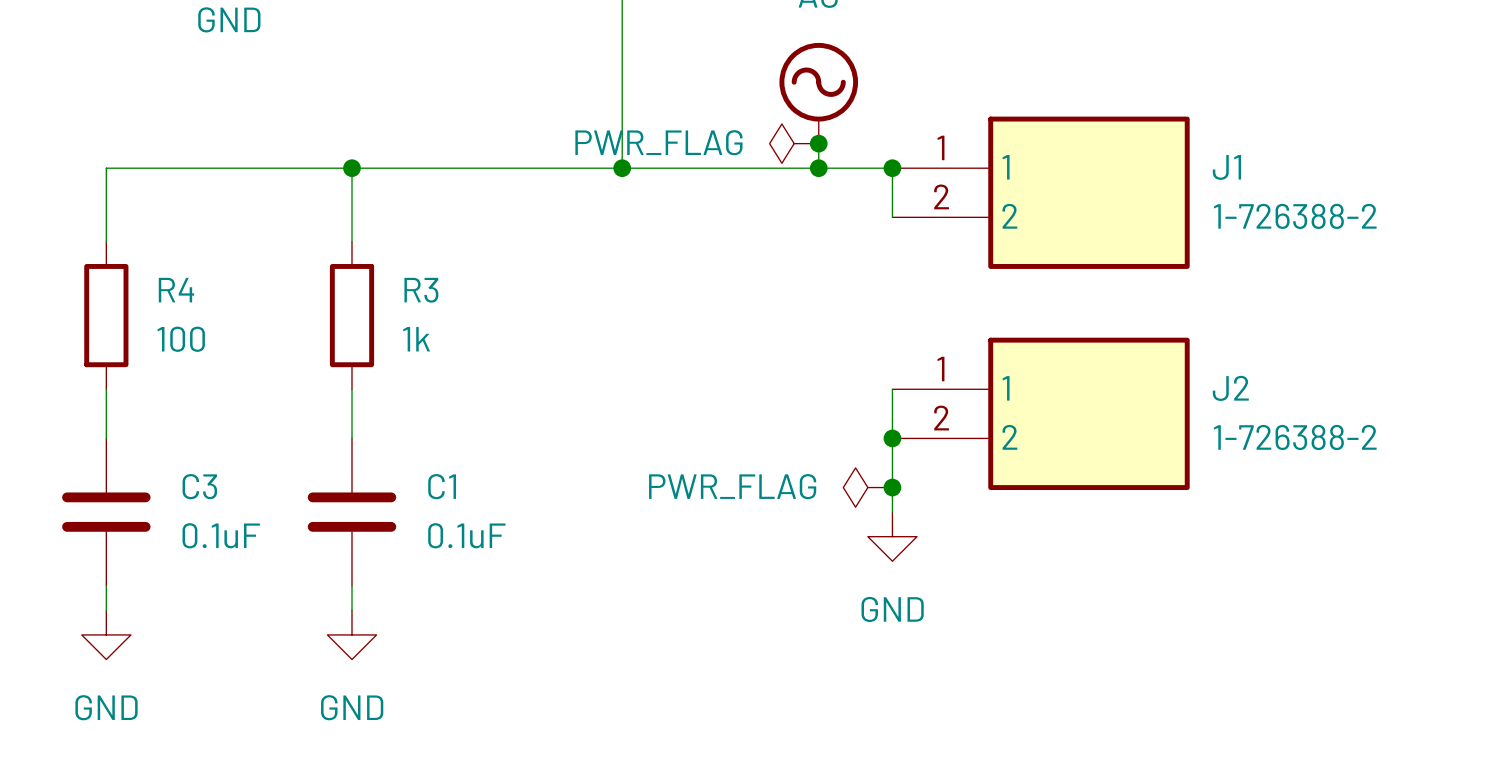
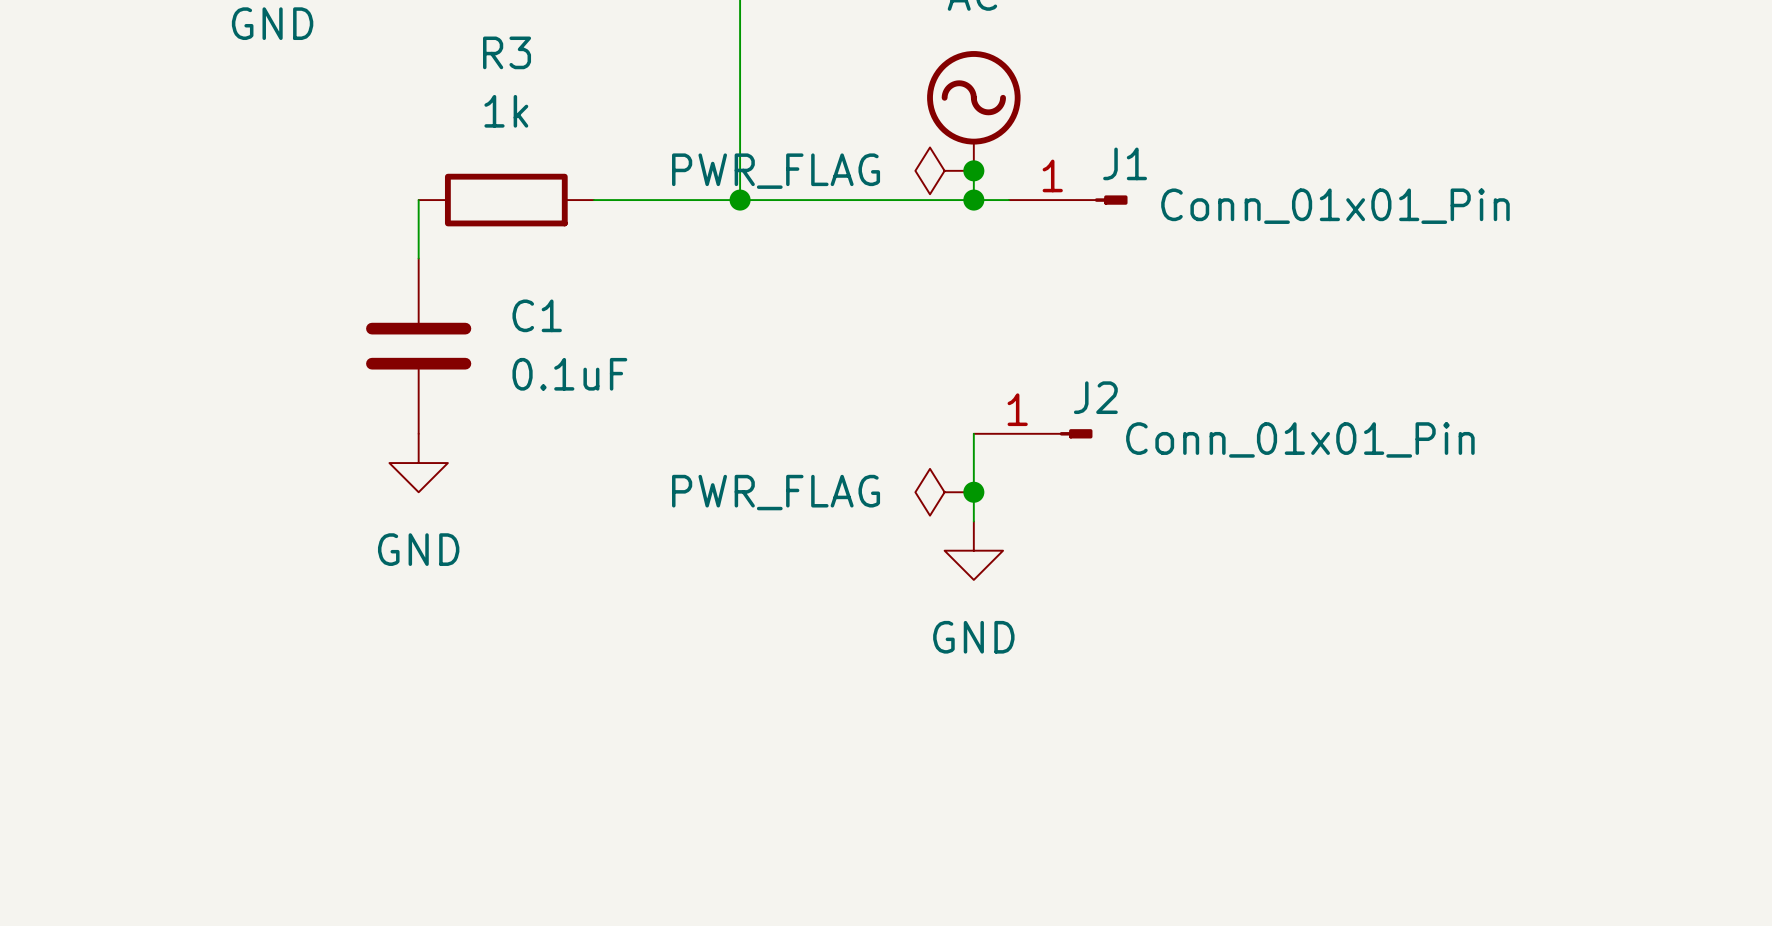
J1 symbol: [892, 116, 1190, 269] -> [1008, 195, 1128, 205]
J1 name position: J1 (1226, 167) -> J1 (1125, 163)
junction: (351, 168) -> none
wire: (499, 168) (106, 168) (106, 241) -> none
wire: (848, 168) (892, 168) (892, 217) -> none
junction: (892, 168) -> none
J1 value: 1-726388-2 (1295, 216) -> Conn_01x01_Pin (1335, 206)
R3 name position: R3 (421, 290) -> R3 (507, 52)
R4: 100 (106, 315) -> none
R3 rotation: 0° (351, 315) -> 90° clockwise (506, 200)
R3 position: (351, 315) -> (506, 200)
J2 symbol: [892, 337, 1190, 491] -> [973, 429, 1093, 439]
R3 value position: 1k (416, 339) -> 1k (506, 111)
wire: none -> (973, 433) (973, 521)
J2 name position: J2 (1230, 388) -> J2 (1095, 397)
wire: (106, 389) (106, 438) -> none
wire: (351, 389) (351, 438) -> none
power symbol: none -> GND (418, 463)
wire: (892, 389) (892, 512) -> none
junction: none -> (973, 492)
J2 value: 1-726388-2 (1295, 437) -> Conn_01x01_Pin (1300, 439)
junction: (892, 438) -> none
power symbol position: PWR_FLAG (867, 487) -> PWR_FLAG (944, 492)
junction: (892, 487) -> none
C3: 0.1uF (106, 512) -> none
C1 position: (351, 512) -> (418, 346)
power symbol position: GND (892, 536) -> GND (973, 550)
wire: (106, 585) (106, 610) -> none
wire: (351, 585) (351, 610) -> none
power symbol: GND (106, 634) -> none
power symbol: GND (351, 634) -> none

